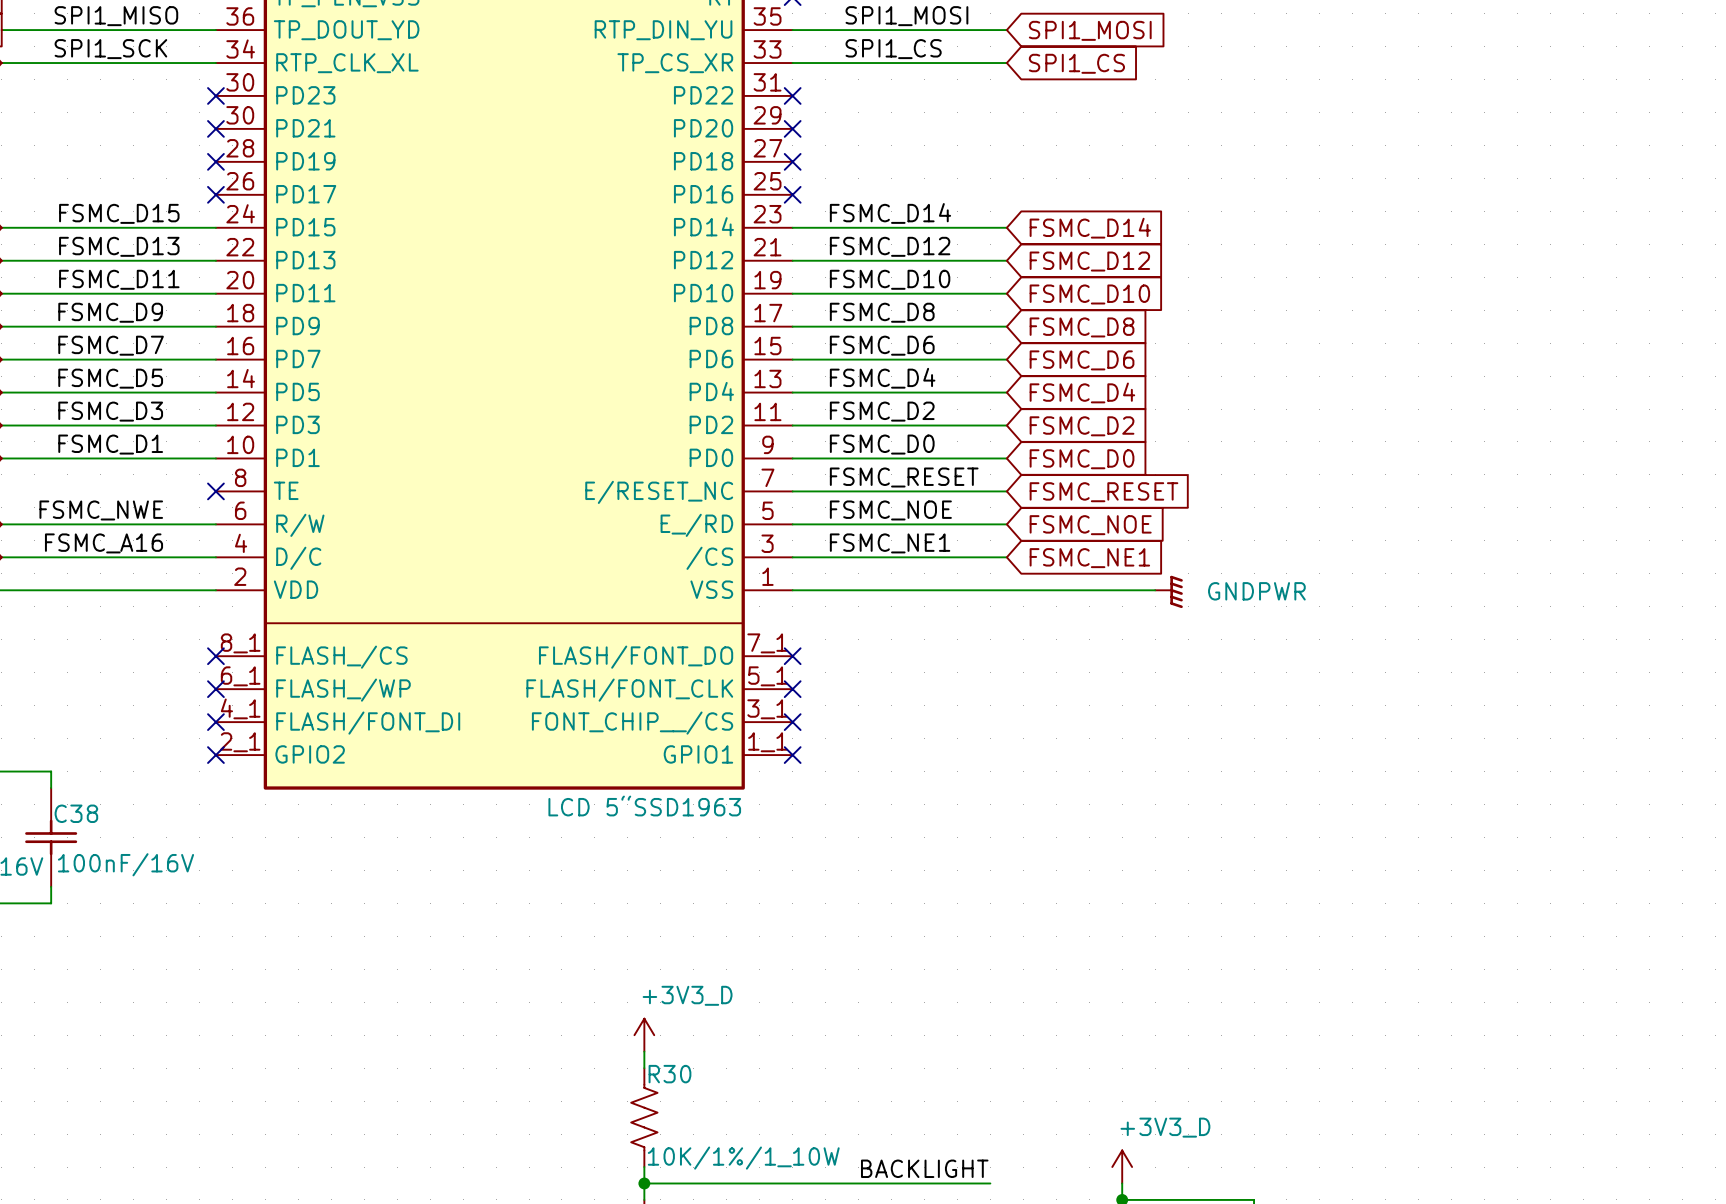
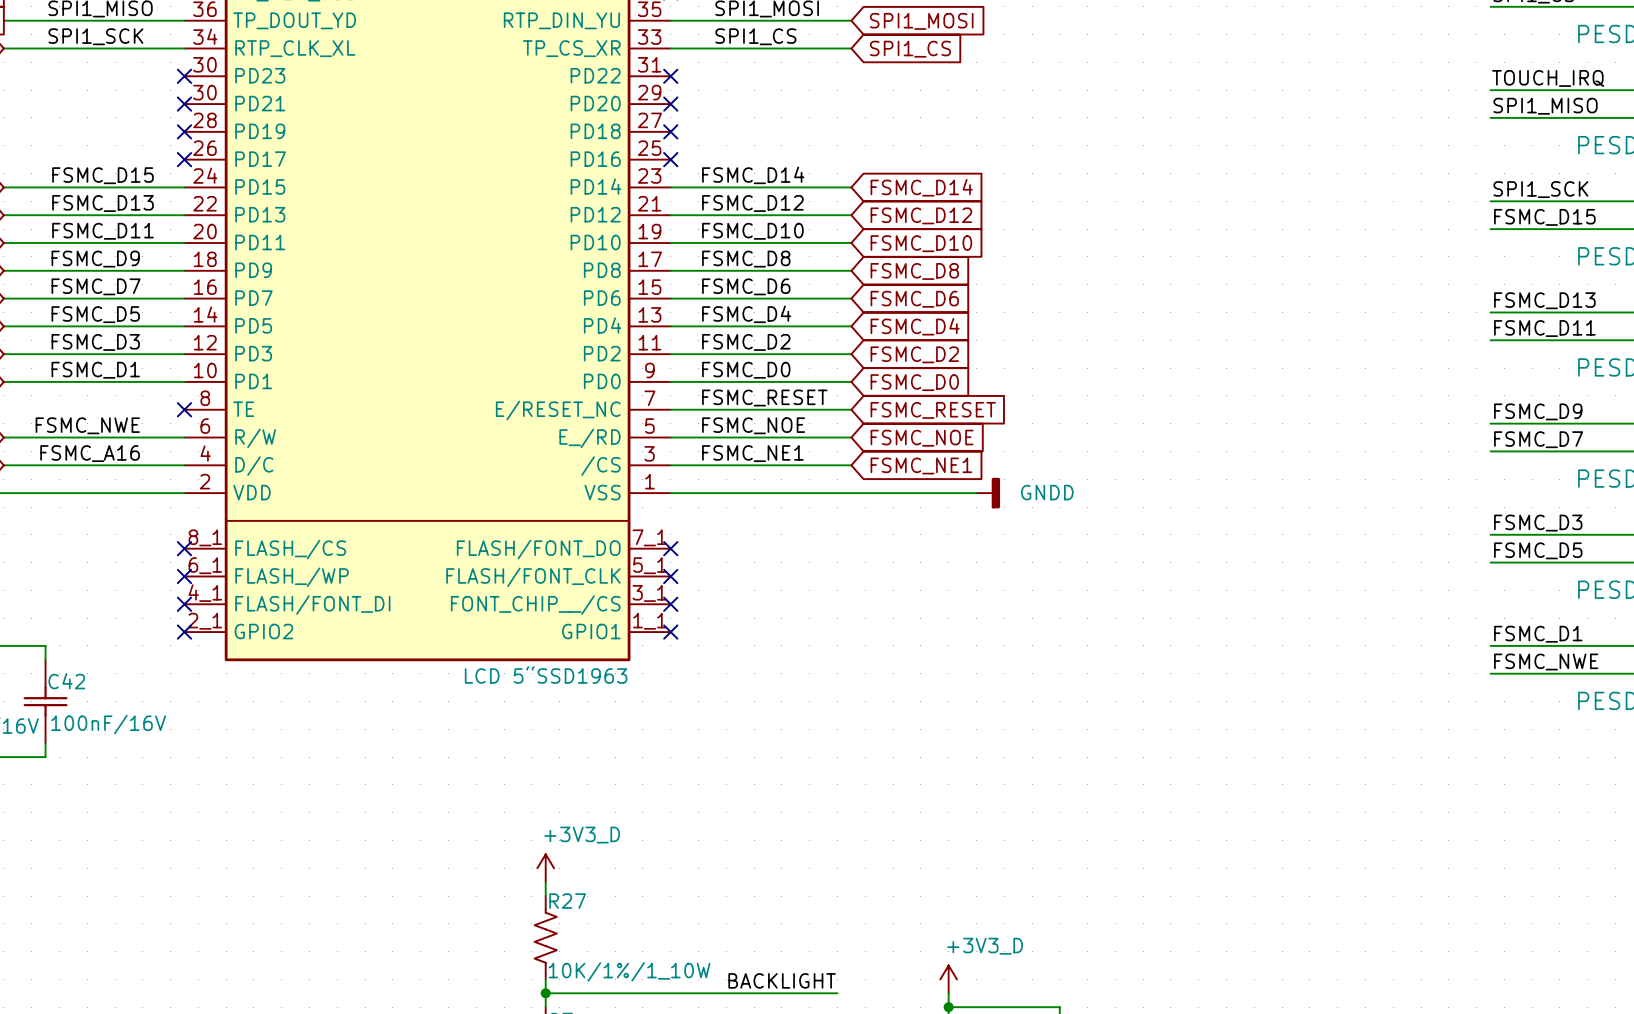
power symbol: GNDPWR (1169, 591) -> GNDD (988, 493)
C38 name: C38 (76, 813) -> C42 (66, 681)
R30 name: R30 (669, 1074) -> R27 (567, 901)

